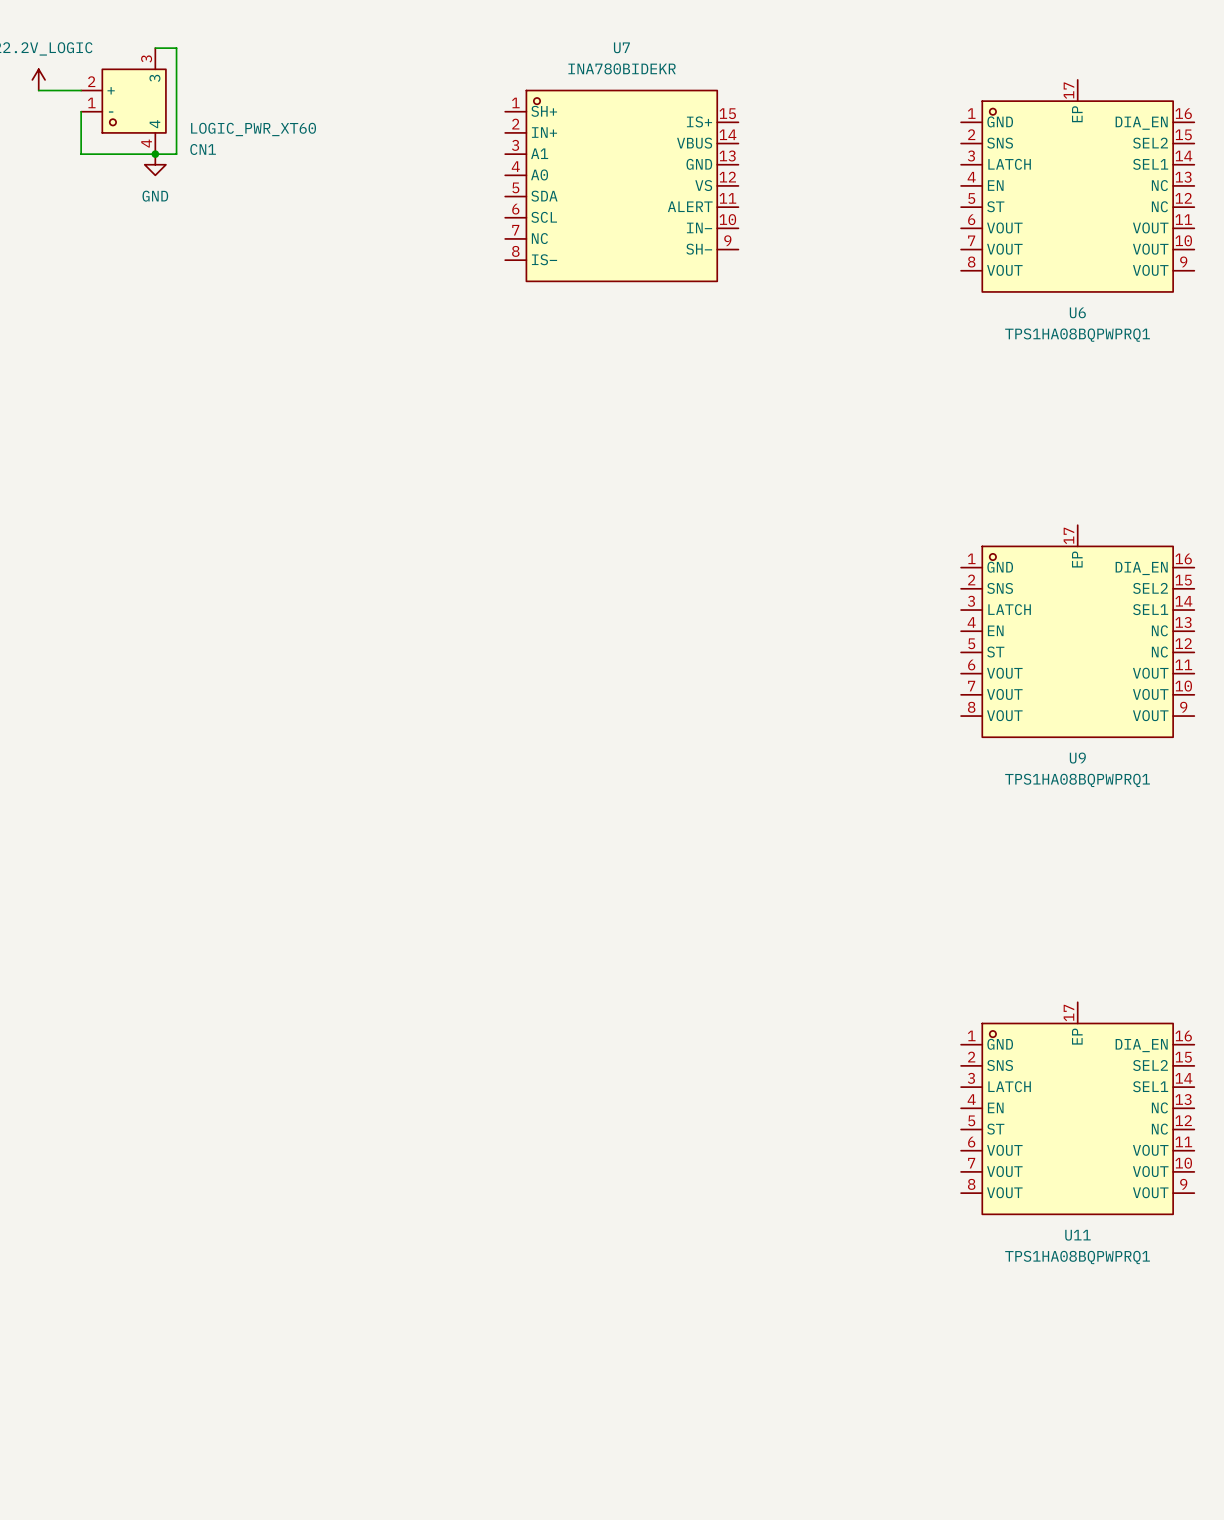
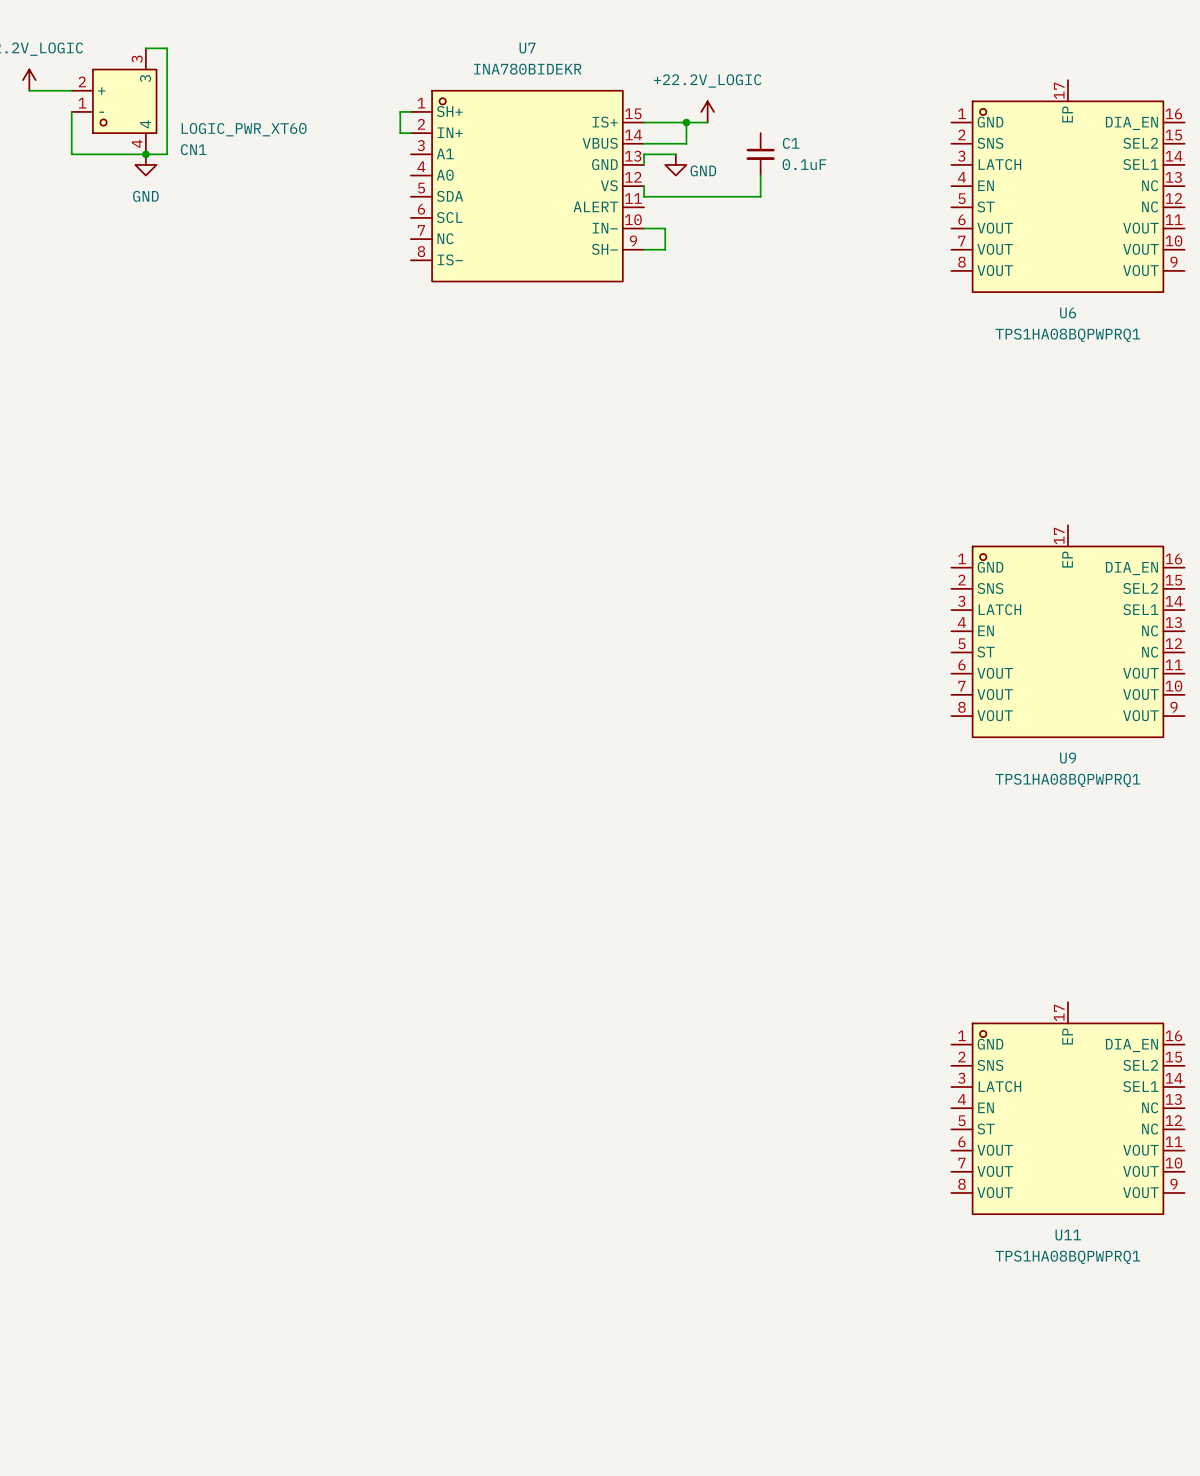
wire: none -> (410, 111) (400, 111) (400, 133) (410, 133)
power symbol: none -> +22.2V_LOGIC (707, 111)
junction: none -> (686, 122)
C1: none -> 0.1uF (760, 154)
power symbol: none -> GND (675, 164)
wire: none -> (760, 175) (760, 196) (644, 196) (644, 186)
U7 position: (621, 185) -> (527, 186)

